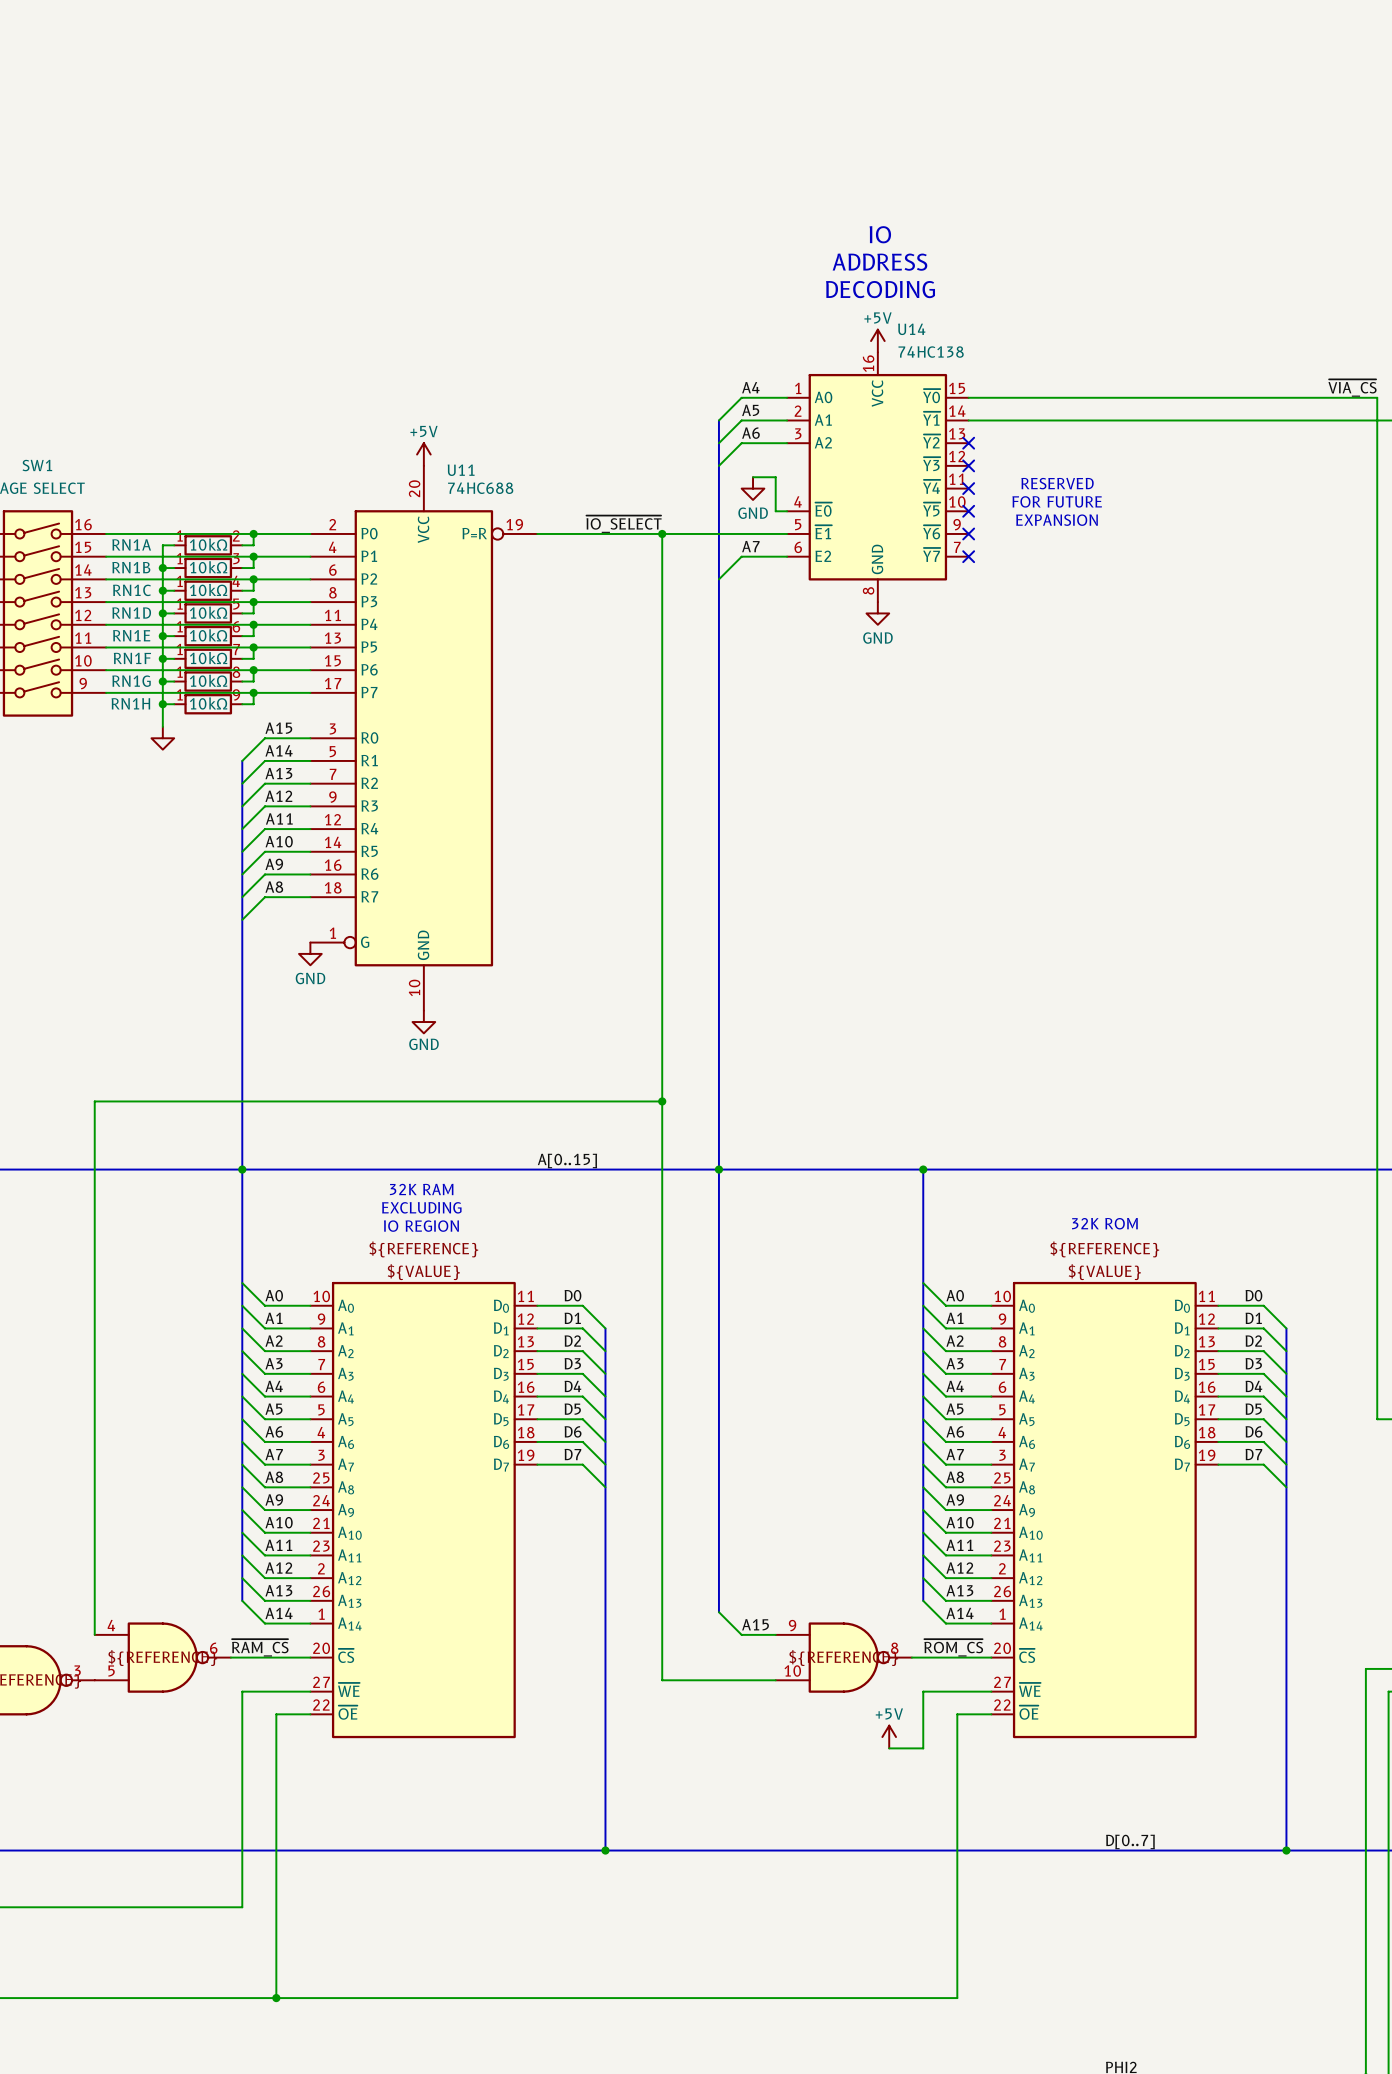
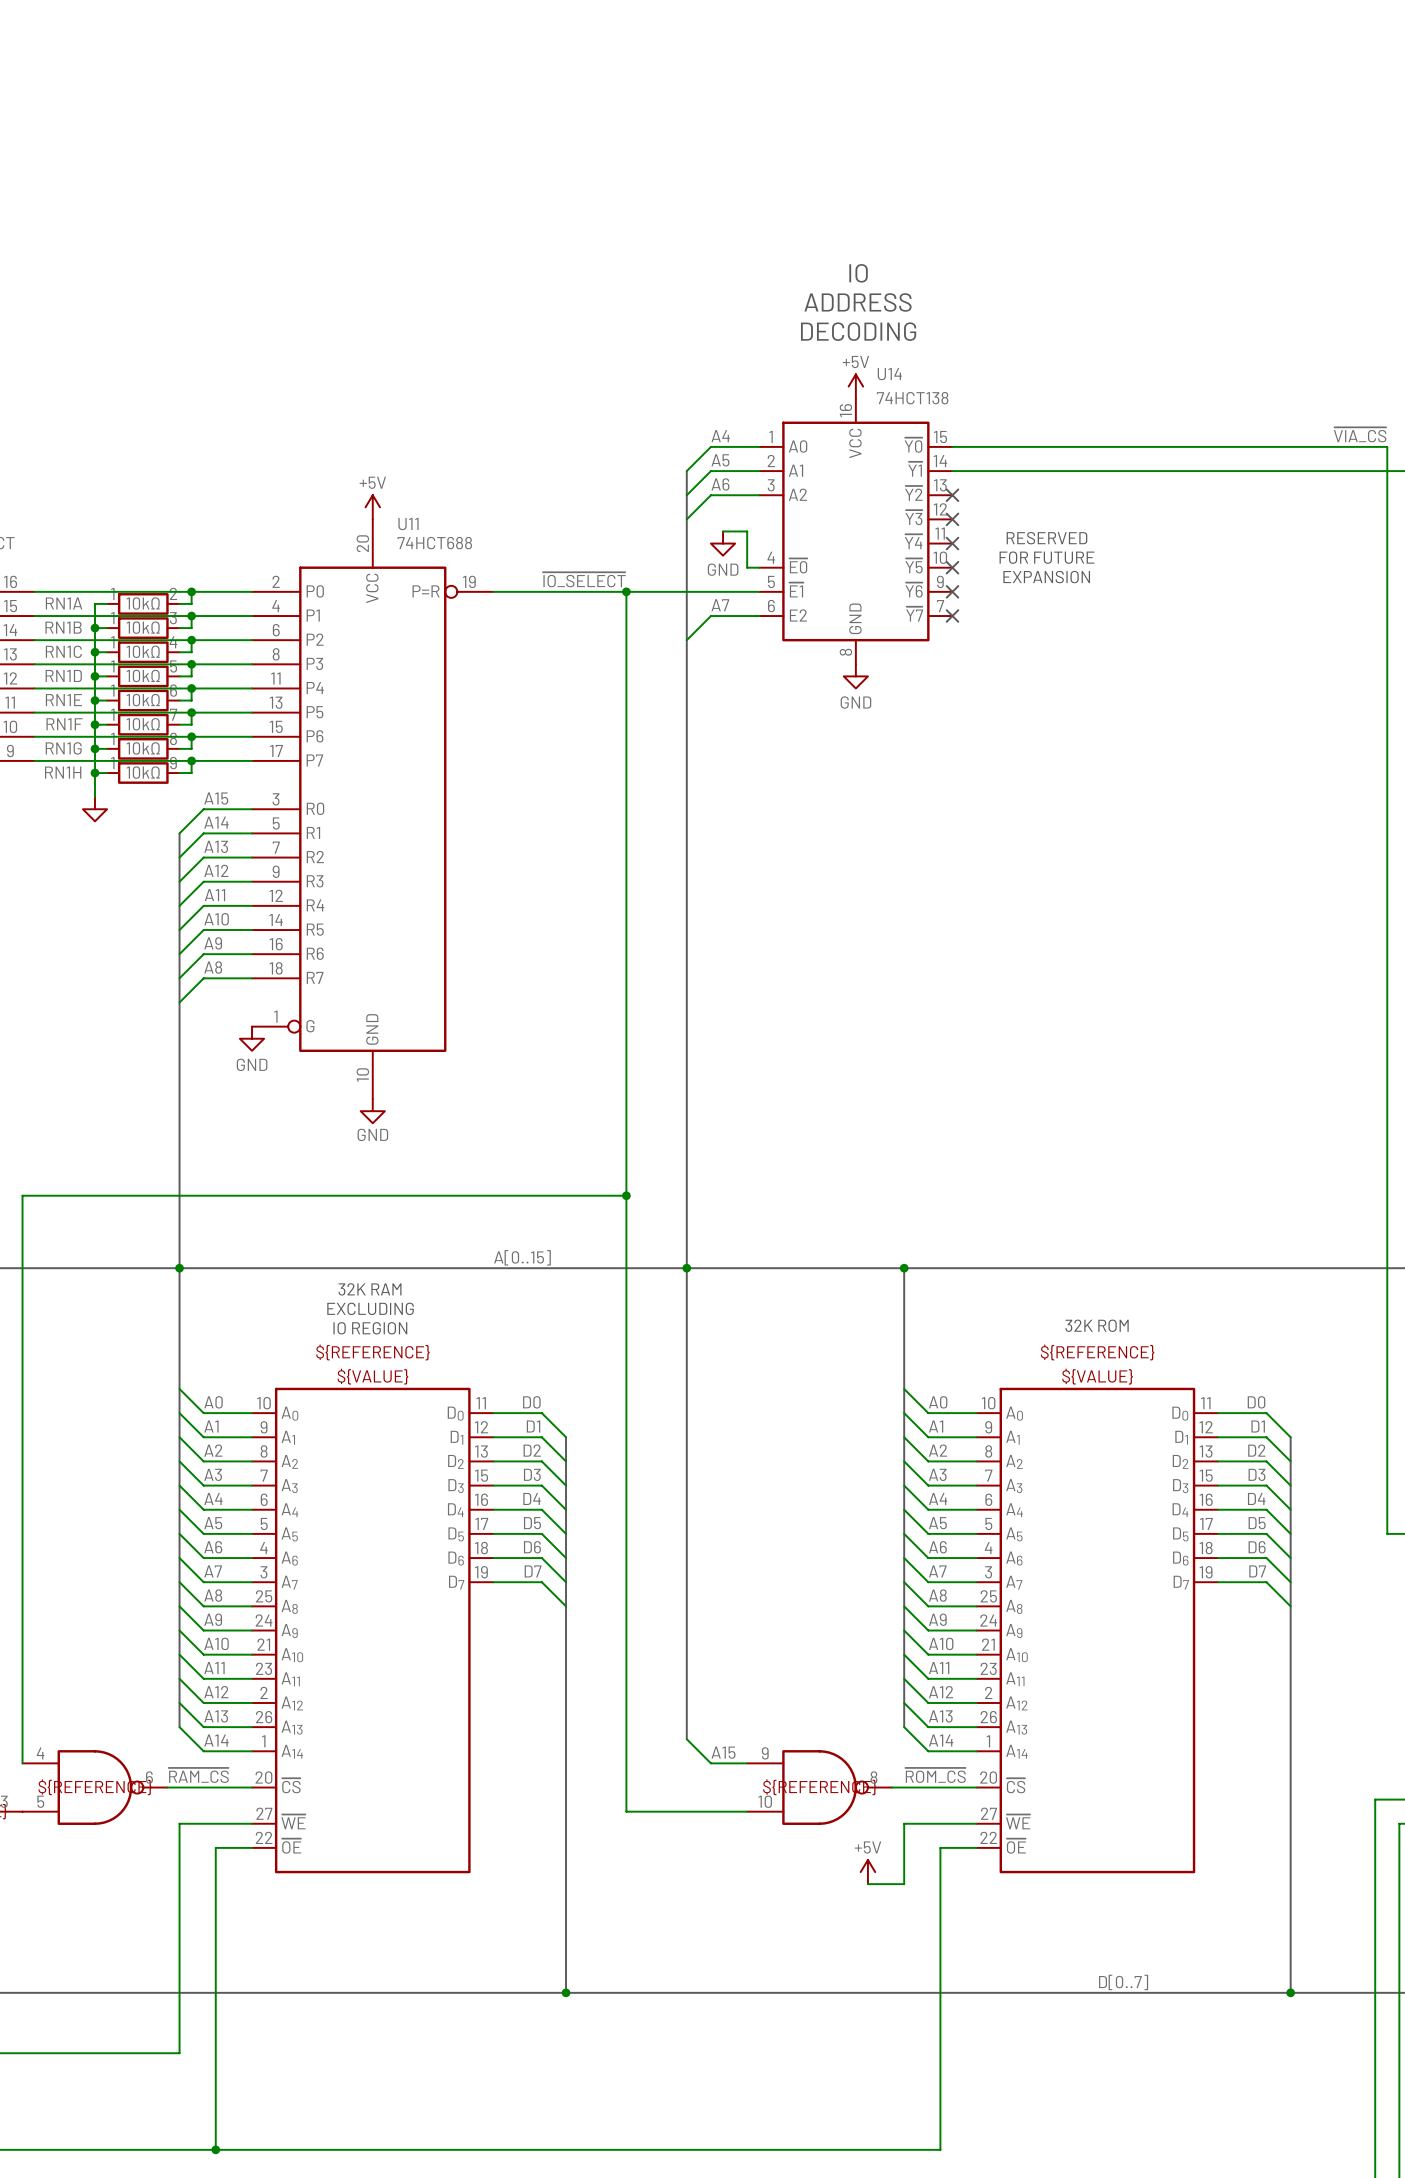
U14 value: 74HC138 (931, 352) -> 74HCT138 (912, 398)
U11 value: 74HC688 (480, 488) -> 74HCT688 (434, 543)

